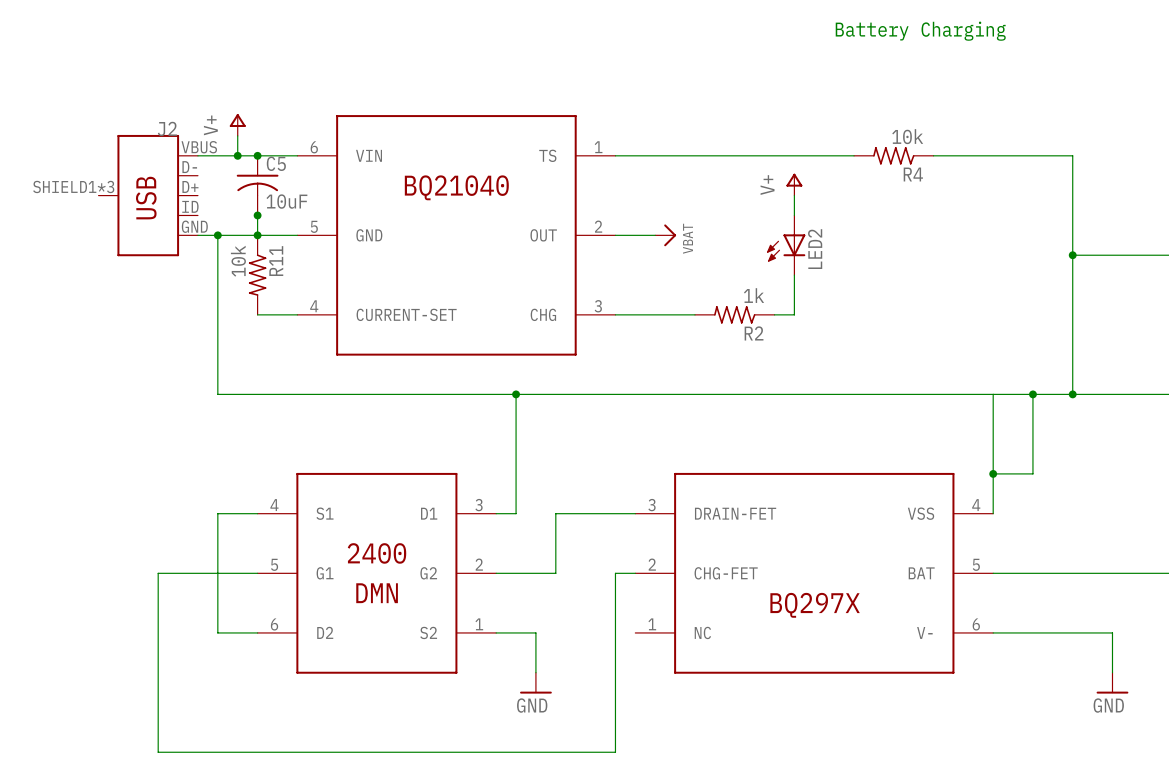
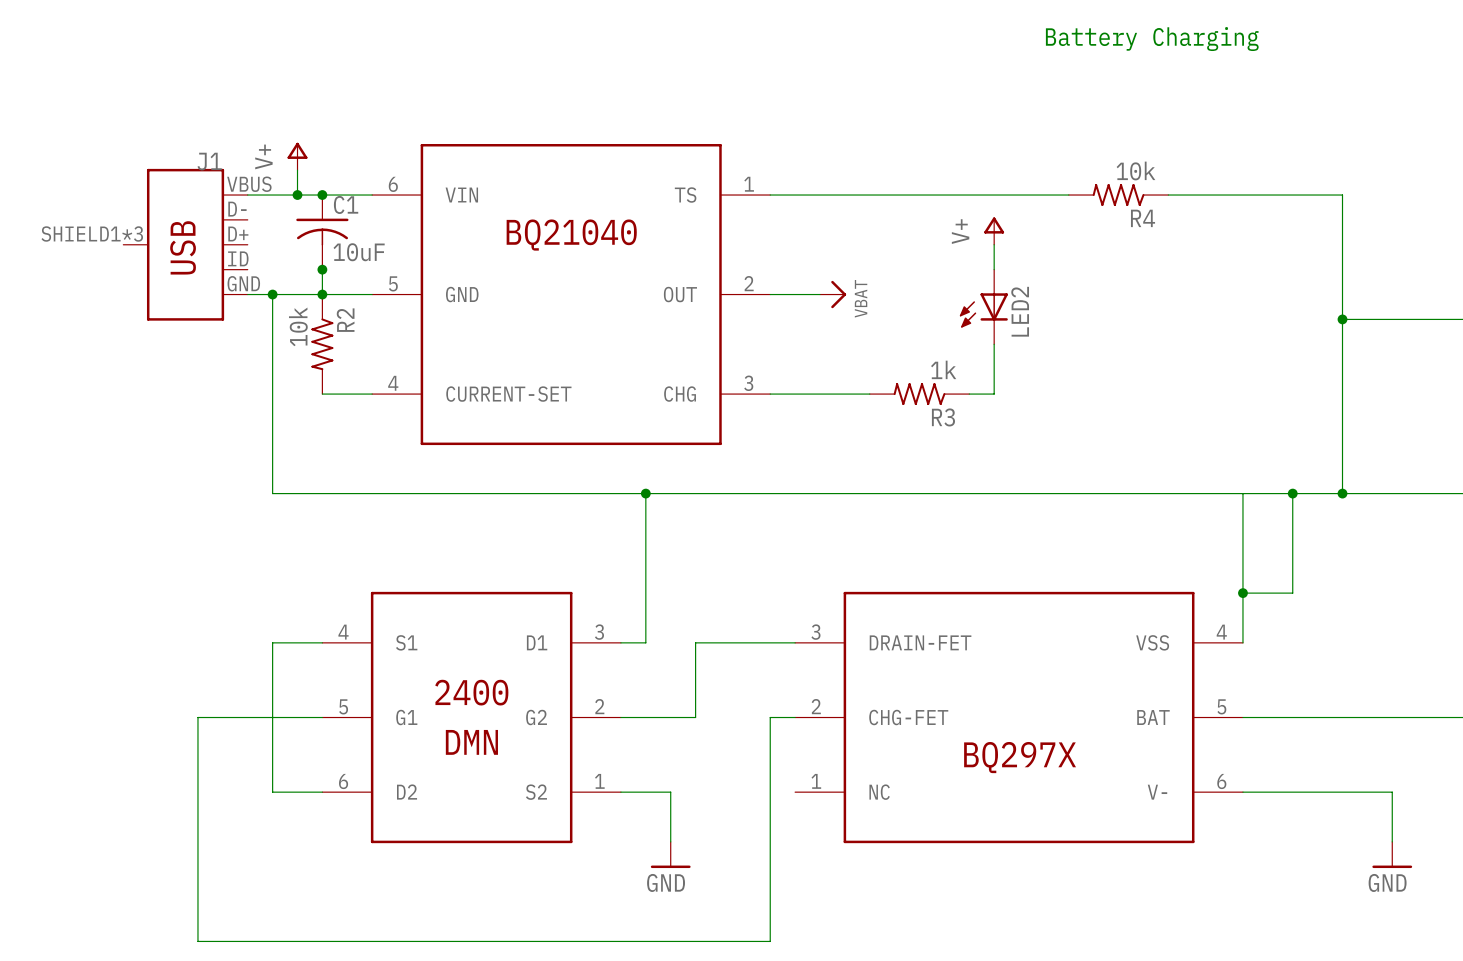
J2 name: J2 (167, 128) -> J1 (209, 161)
C5 name: C5 (276, 163) -> C1 (346, 204)
R11 name: R11 (276, 261) -> R2 (345, 320)
R2 name: R2 (754, 333) -> R3 (943, 417)

